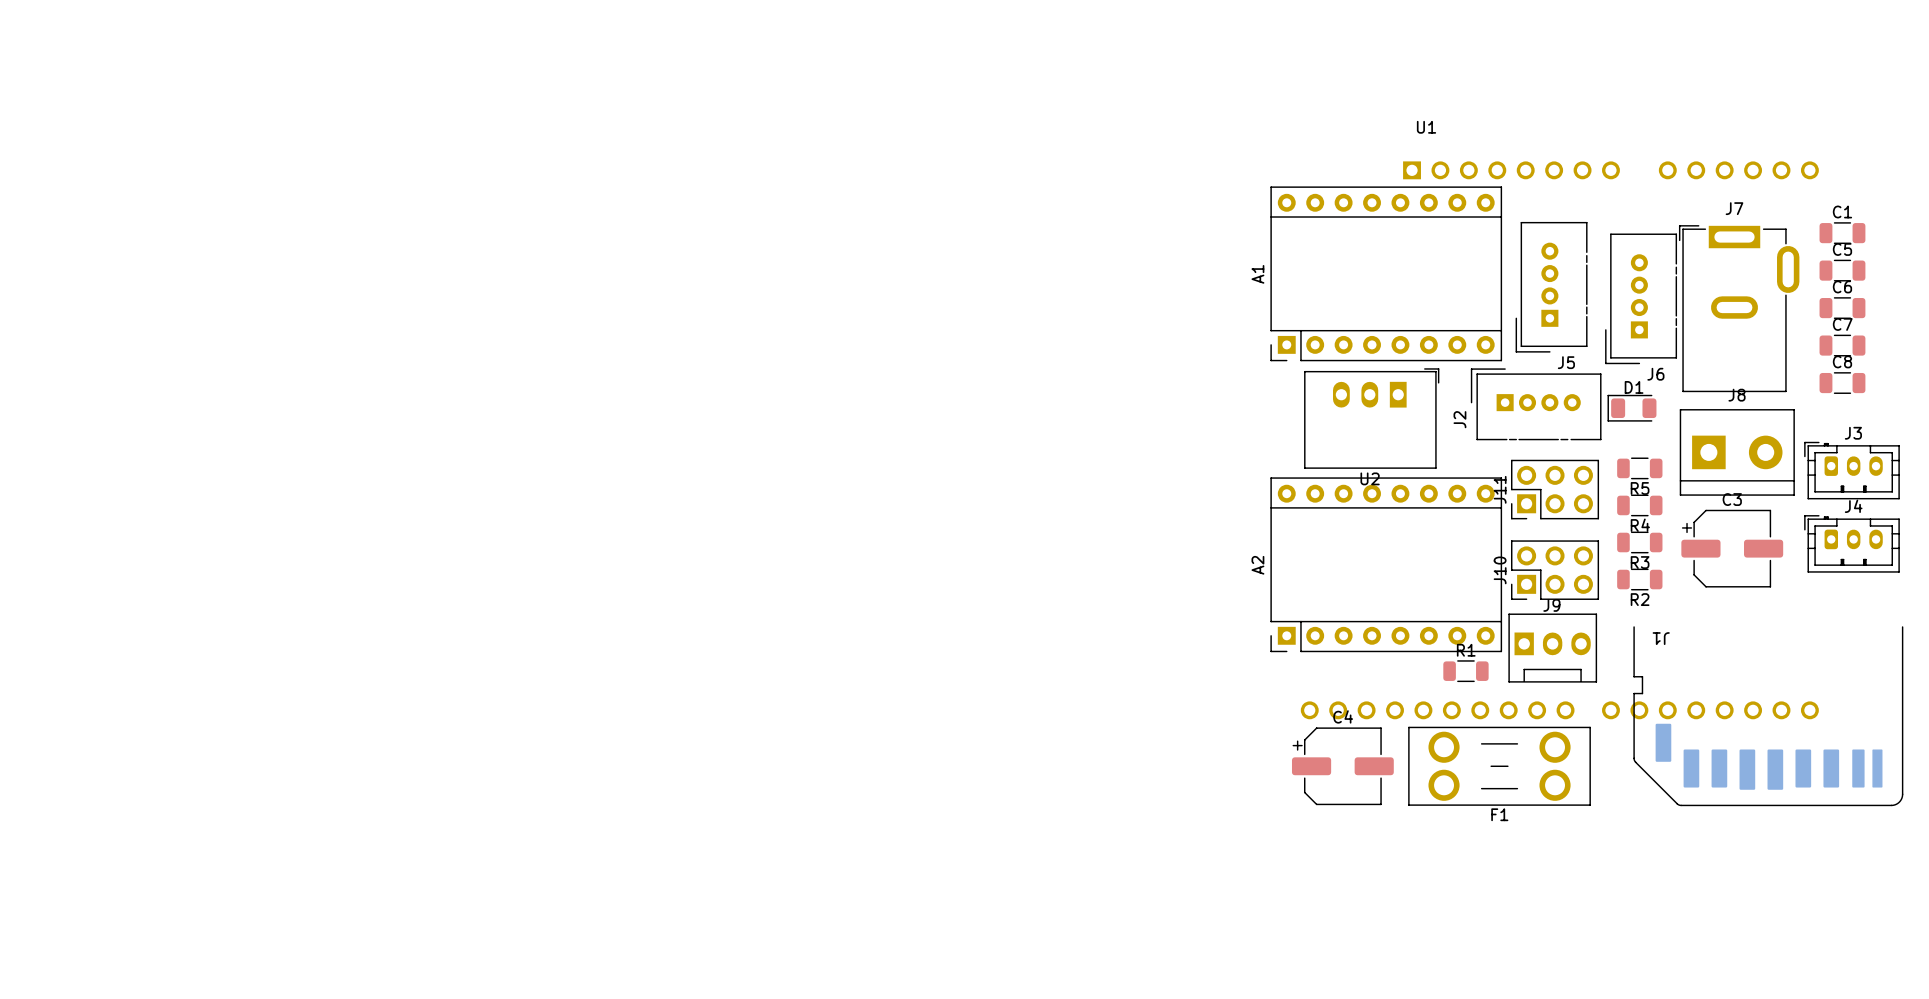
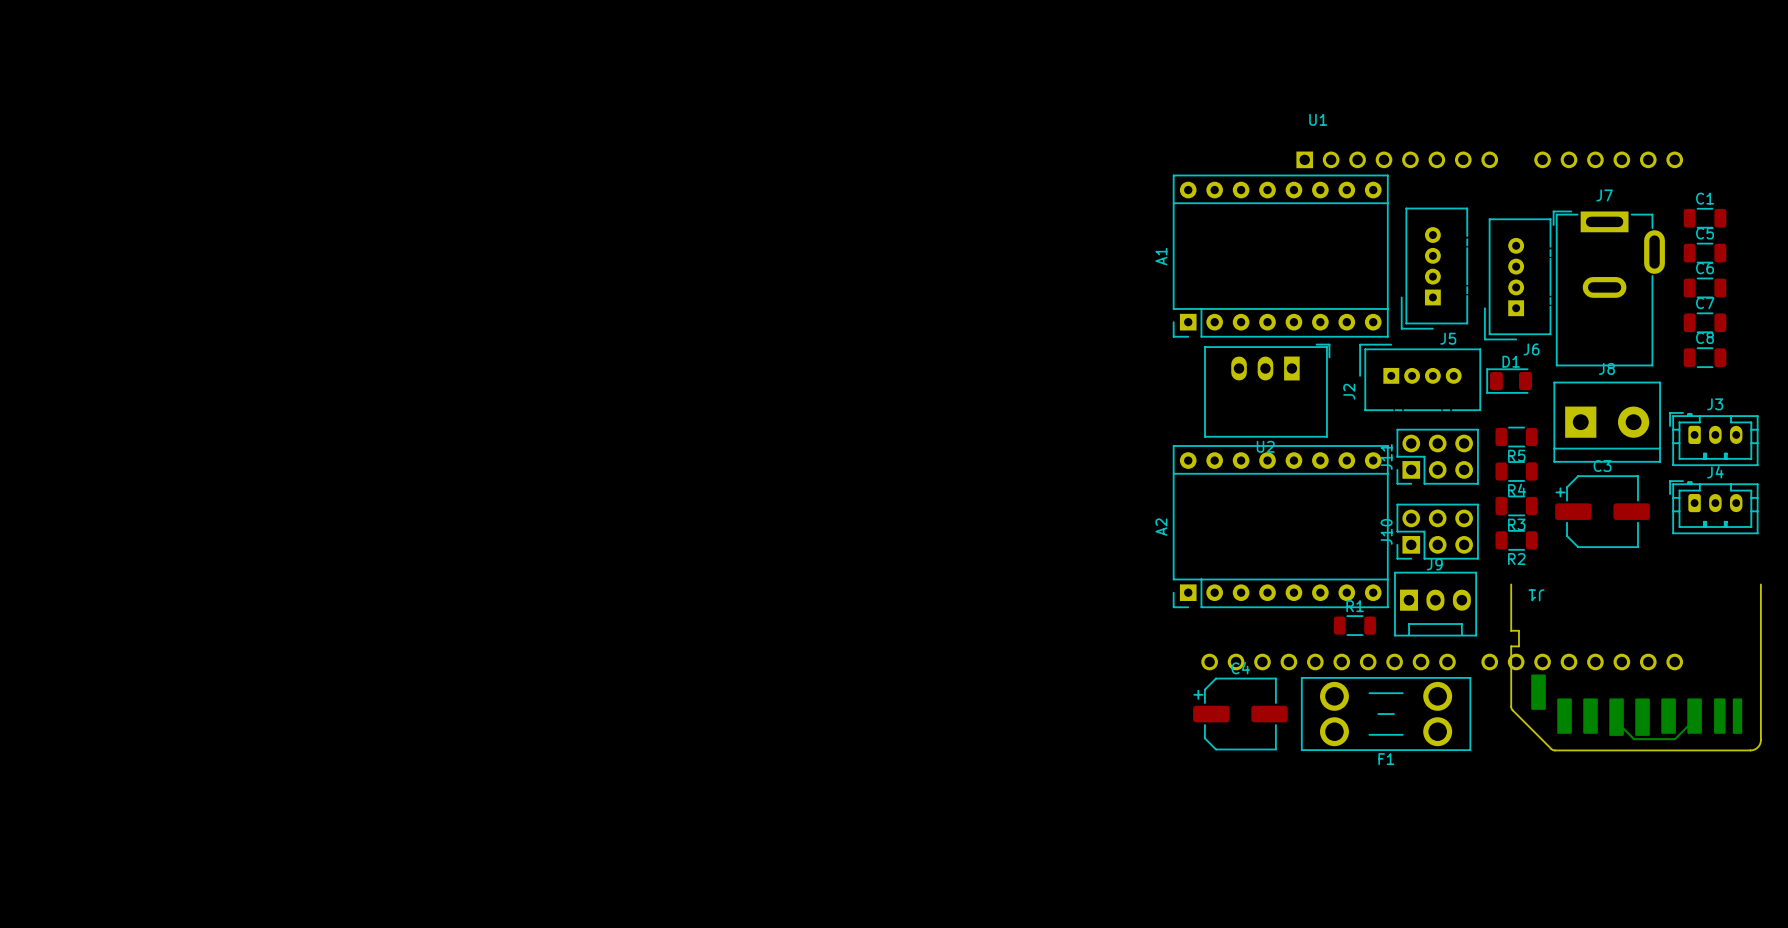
bottom track: none -> (1694, 716) (1694, 719) (1675, 739) (1634, 739) (1616, 721) (1616, 717)

